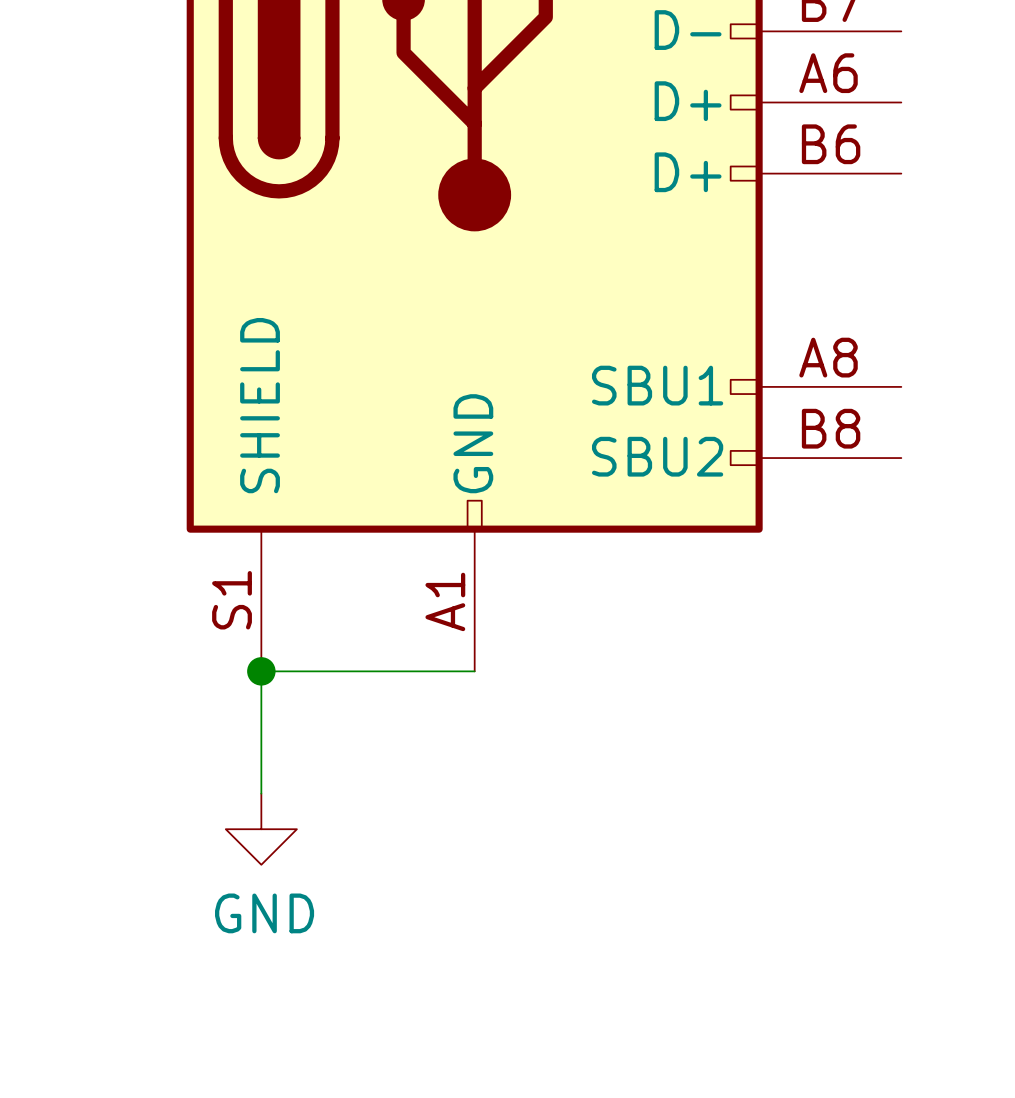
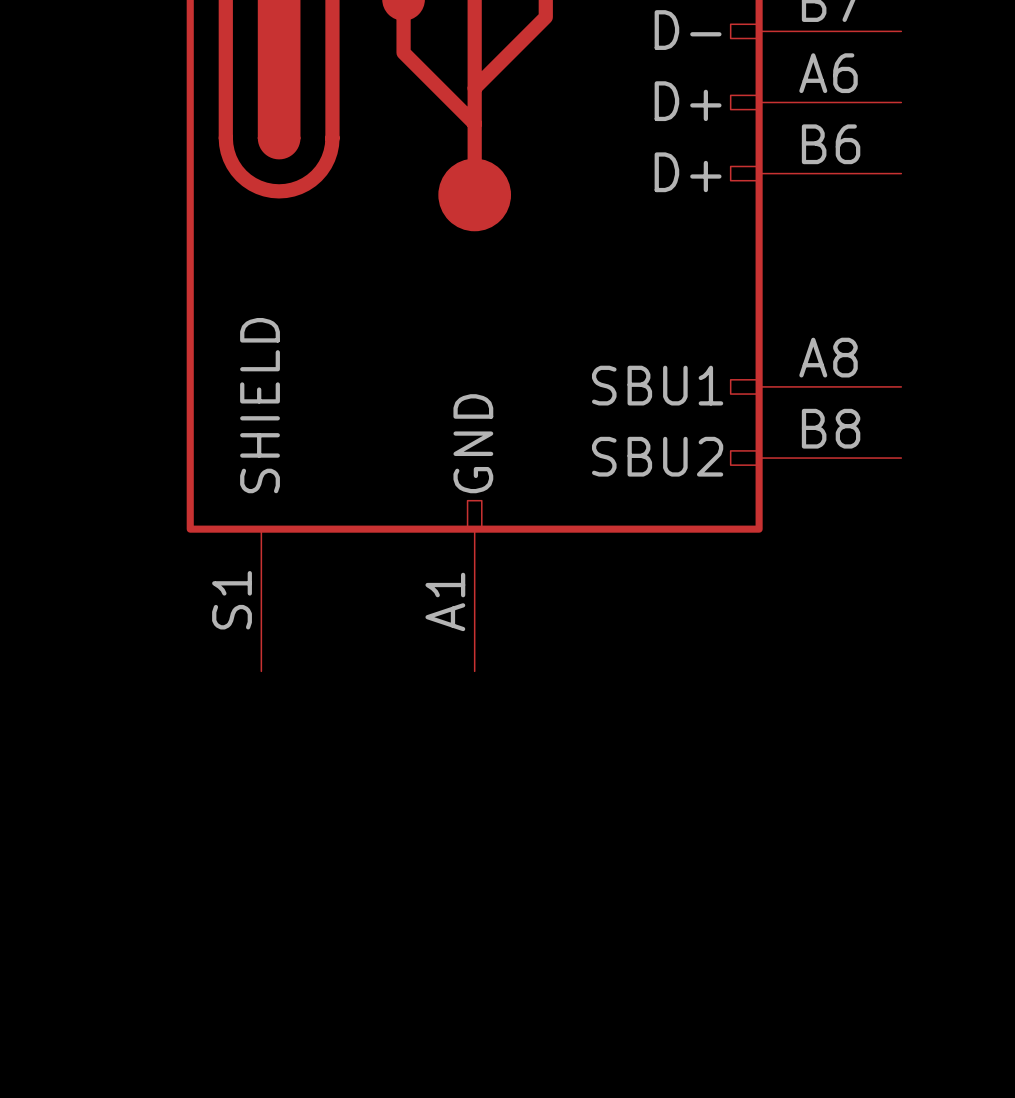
junction: (261, 671) -> none
wire: (474, 671) (261, 671) (261, 793) -> none
power symbol: GND (261, 829) -> none

